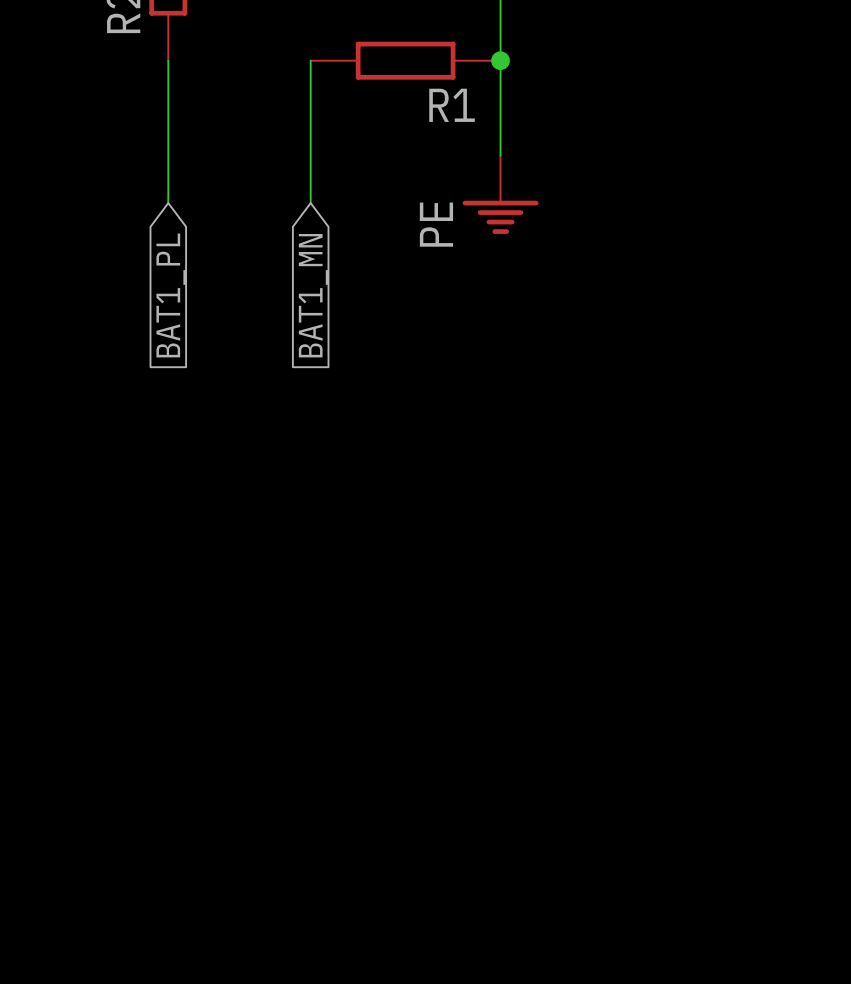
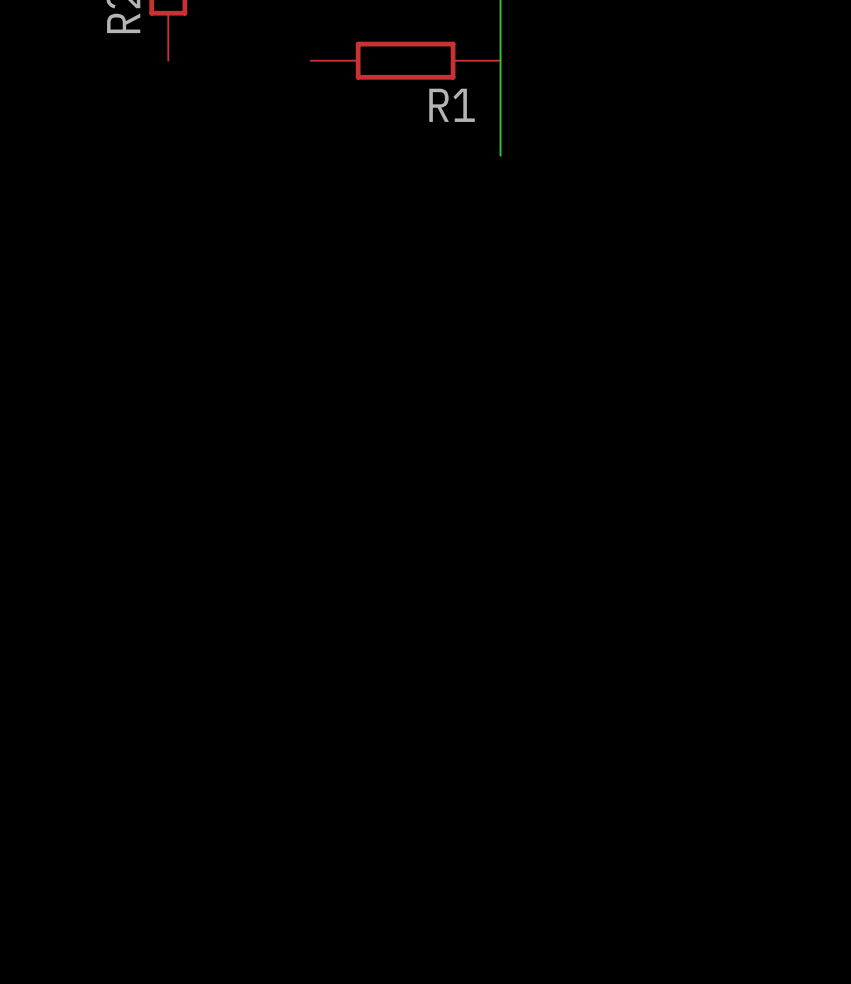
wire: (168, 60) (168, 203) -> none
wire: (310, 60) (310, 203) -> none
junction: (500, 60) -> none
power symbol: PE (500, 194) -> none
global label: BAT1_PL (171, 295) -> none
global label: BAT1_MN (313, 295) -> none

